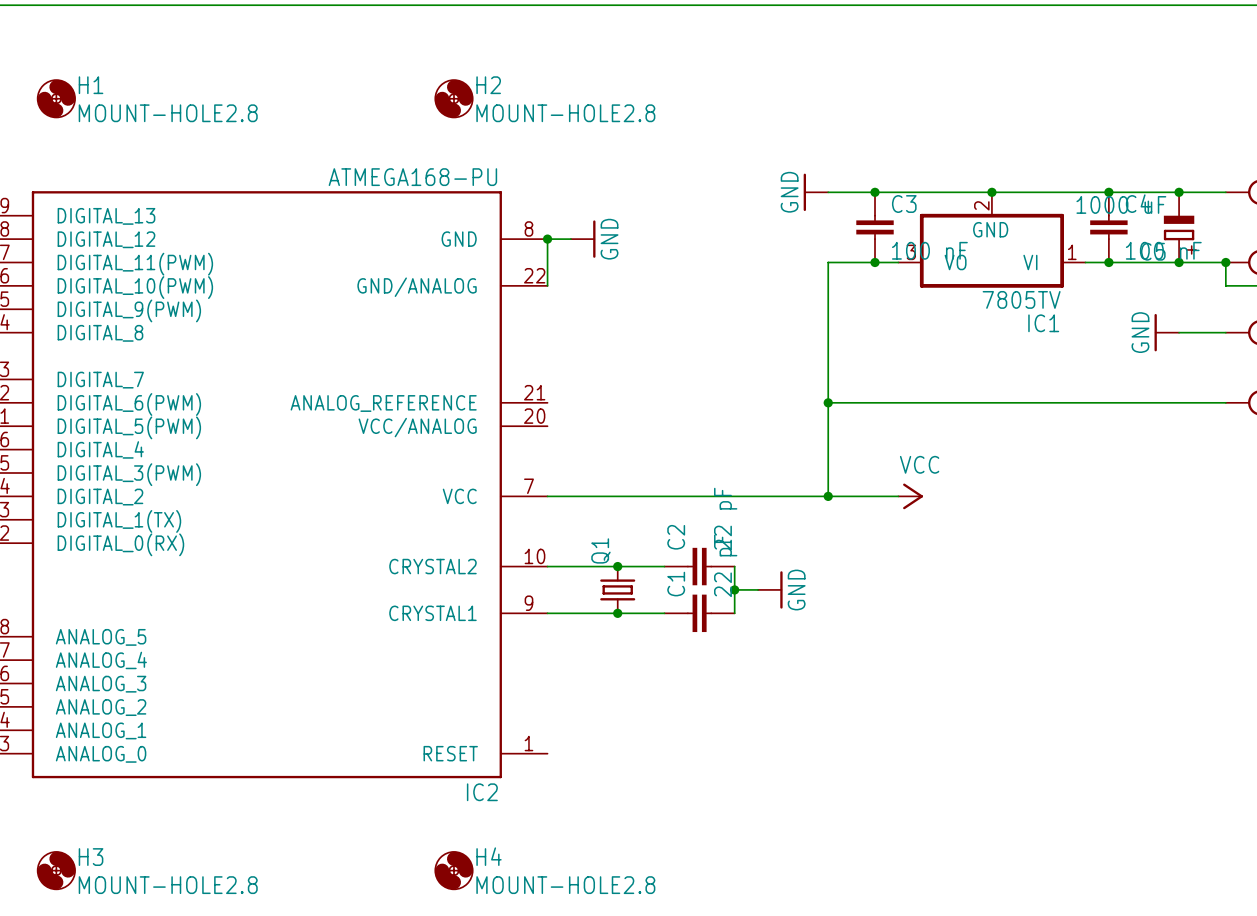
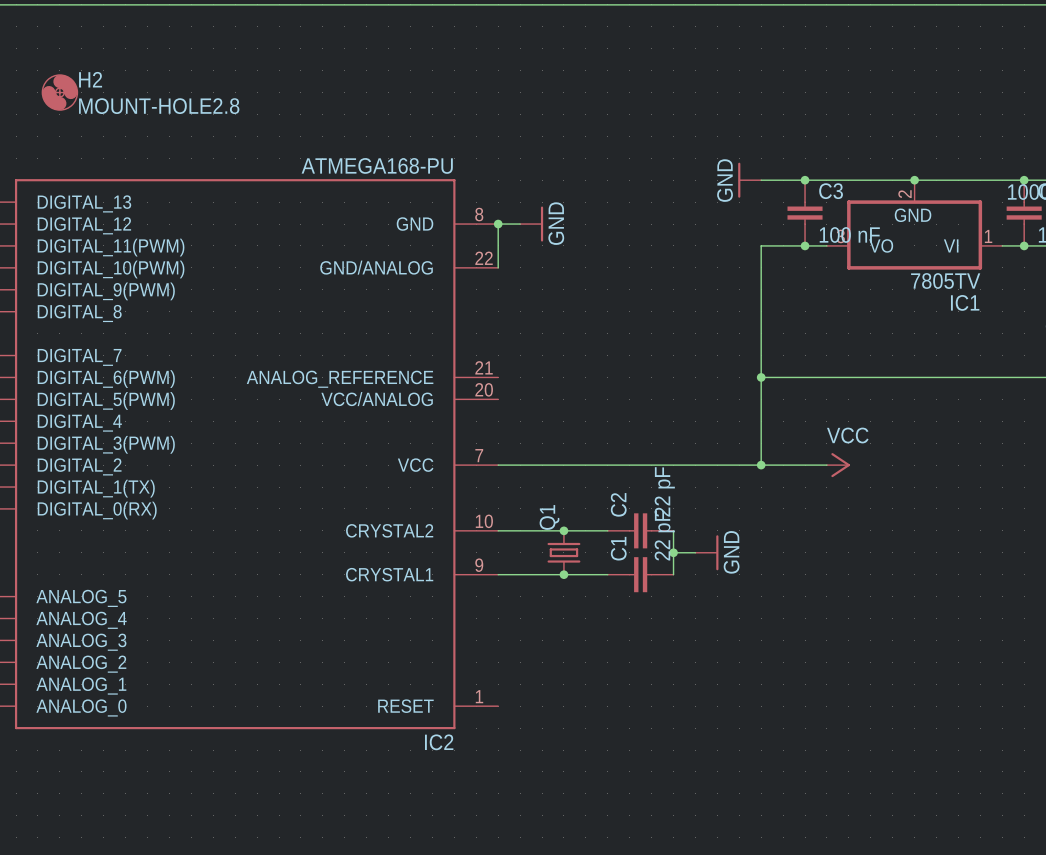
H1: MOUNT-HOLE2.8 (56, 98) -> none
H2 position: (453, 98) -> (59, 92)
H3: MOUNT-HOLE2.8 (56, 870) -> none
H4: MOUNT-HOLE2.8 (453, 870) -> none

